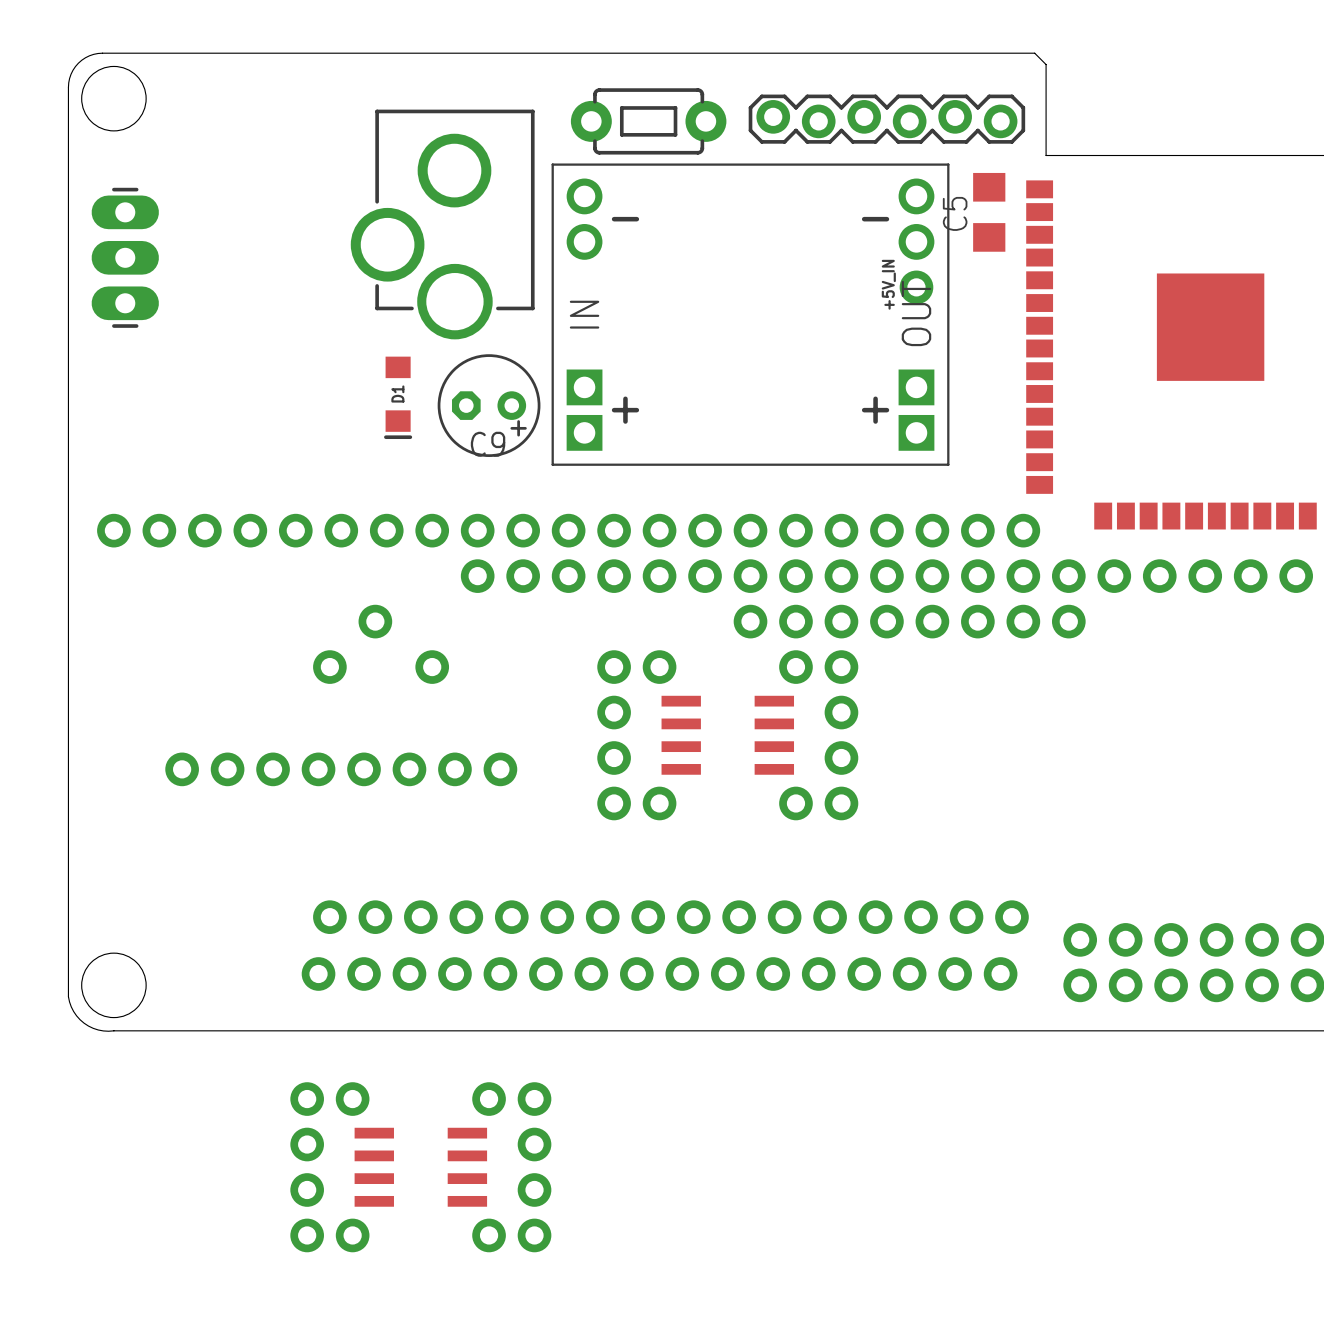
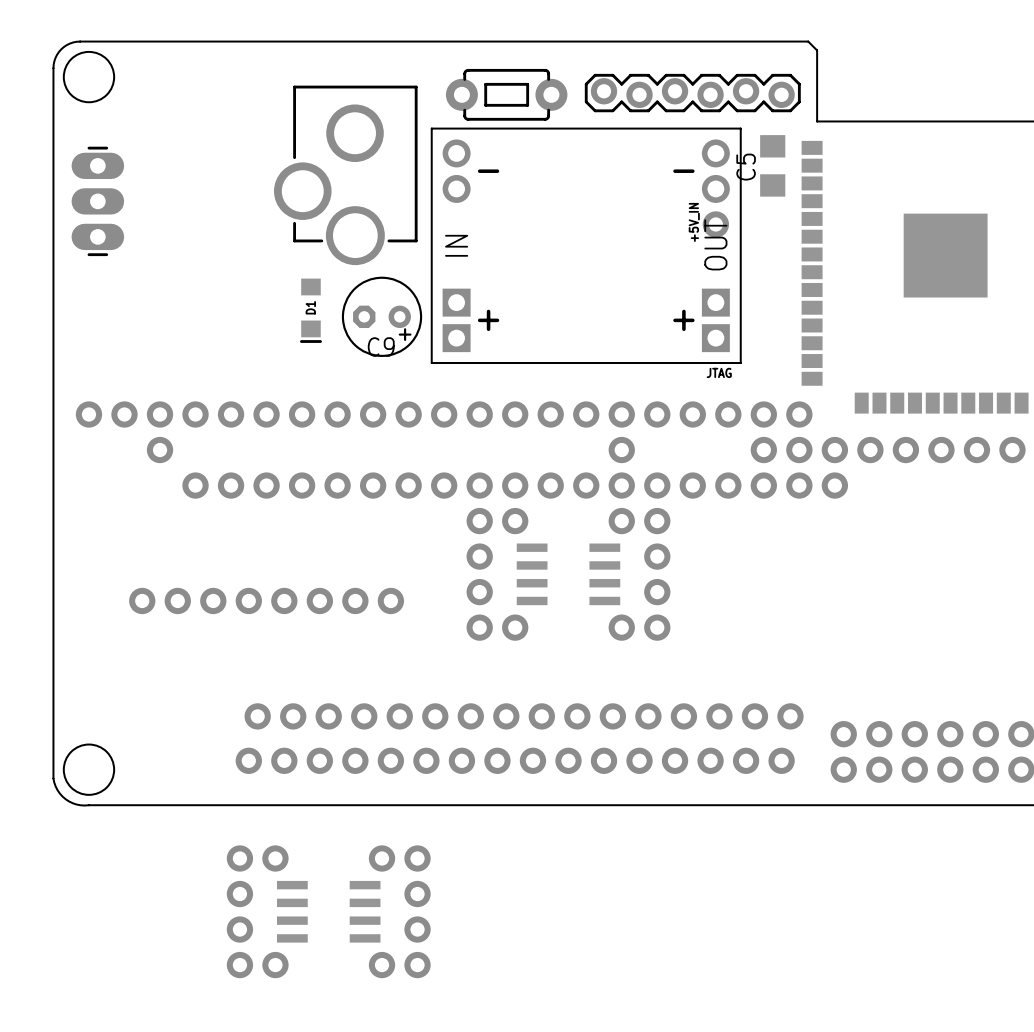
JTAG: none -> (728, 414)
part: none -> (160, 432)
part position: (705, 576) -> (373, 485)
part: (375, 621) -> none
part: (329, 667) -> none
part: (432, 667) -> none

